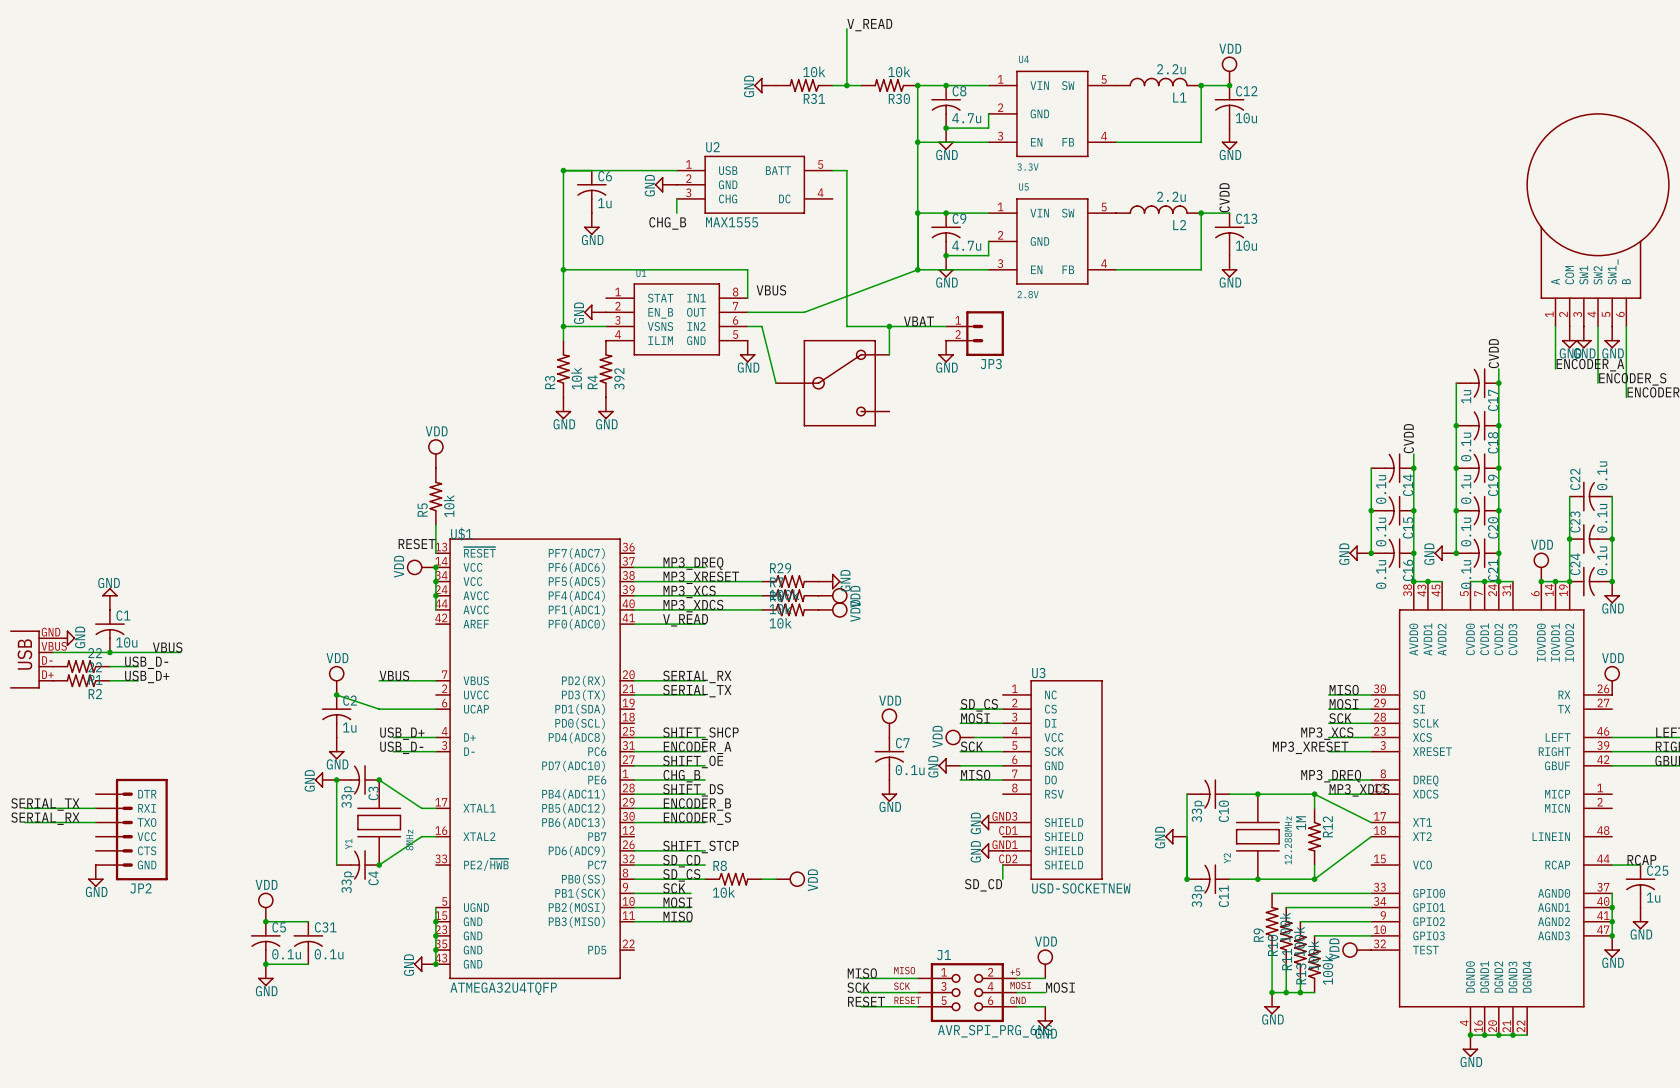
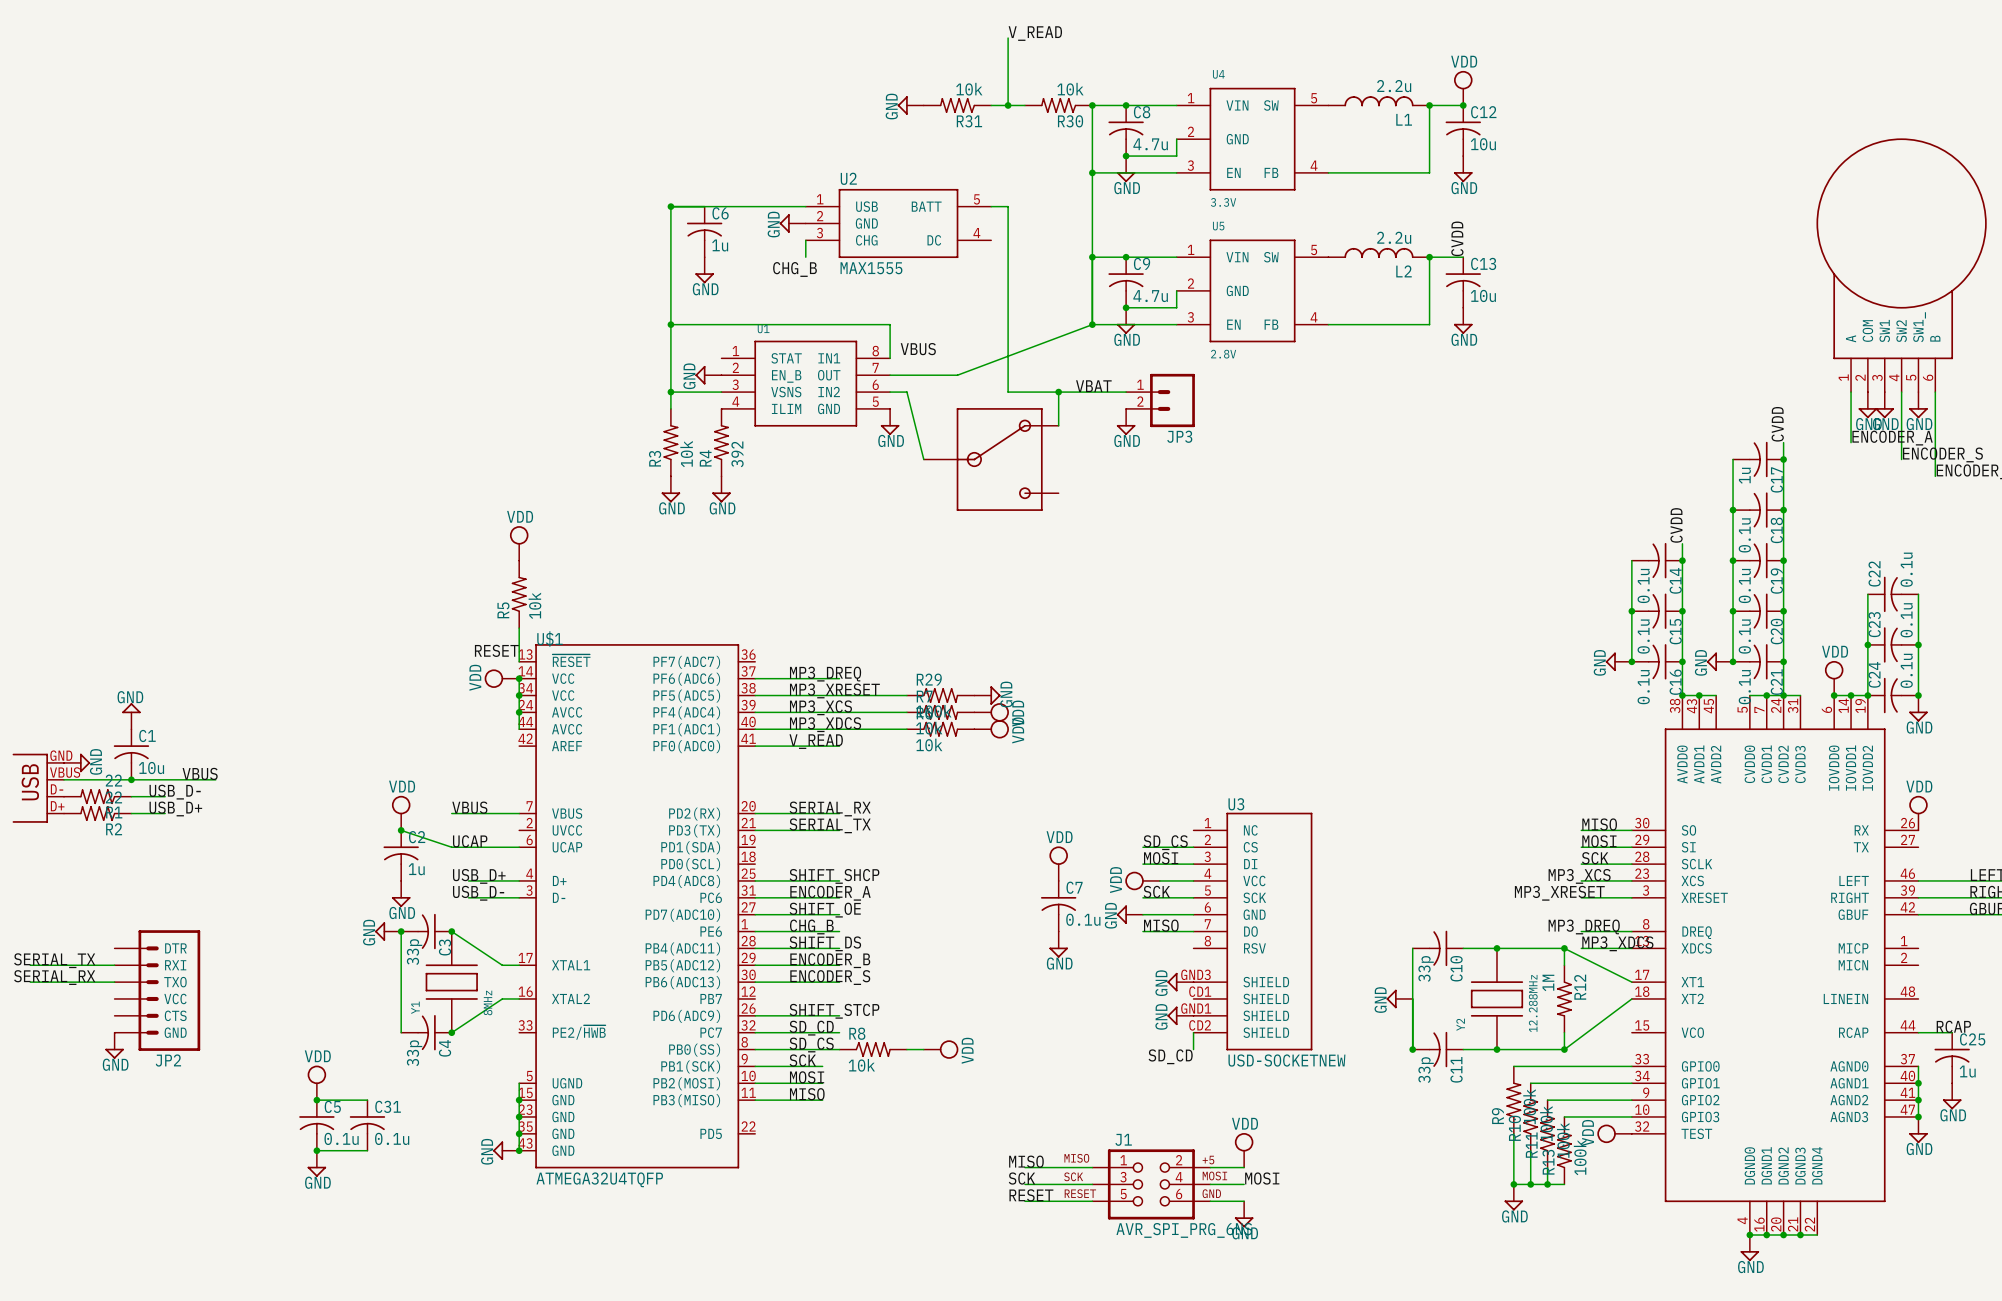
label: none -> UCAP (470, 841)

